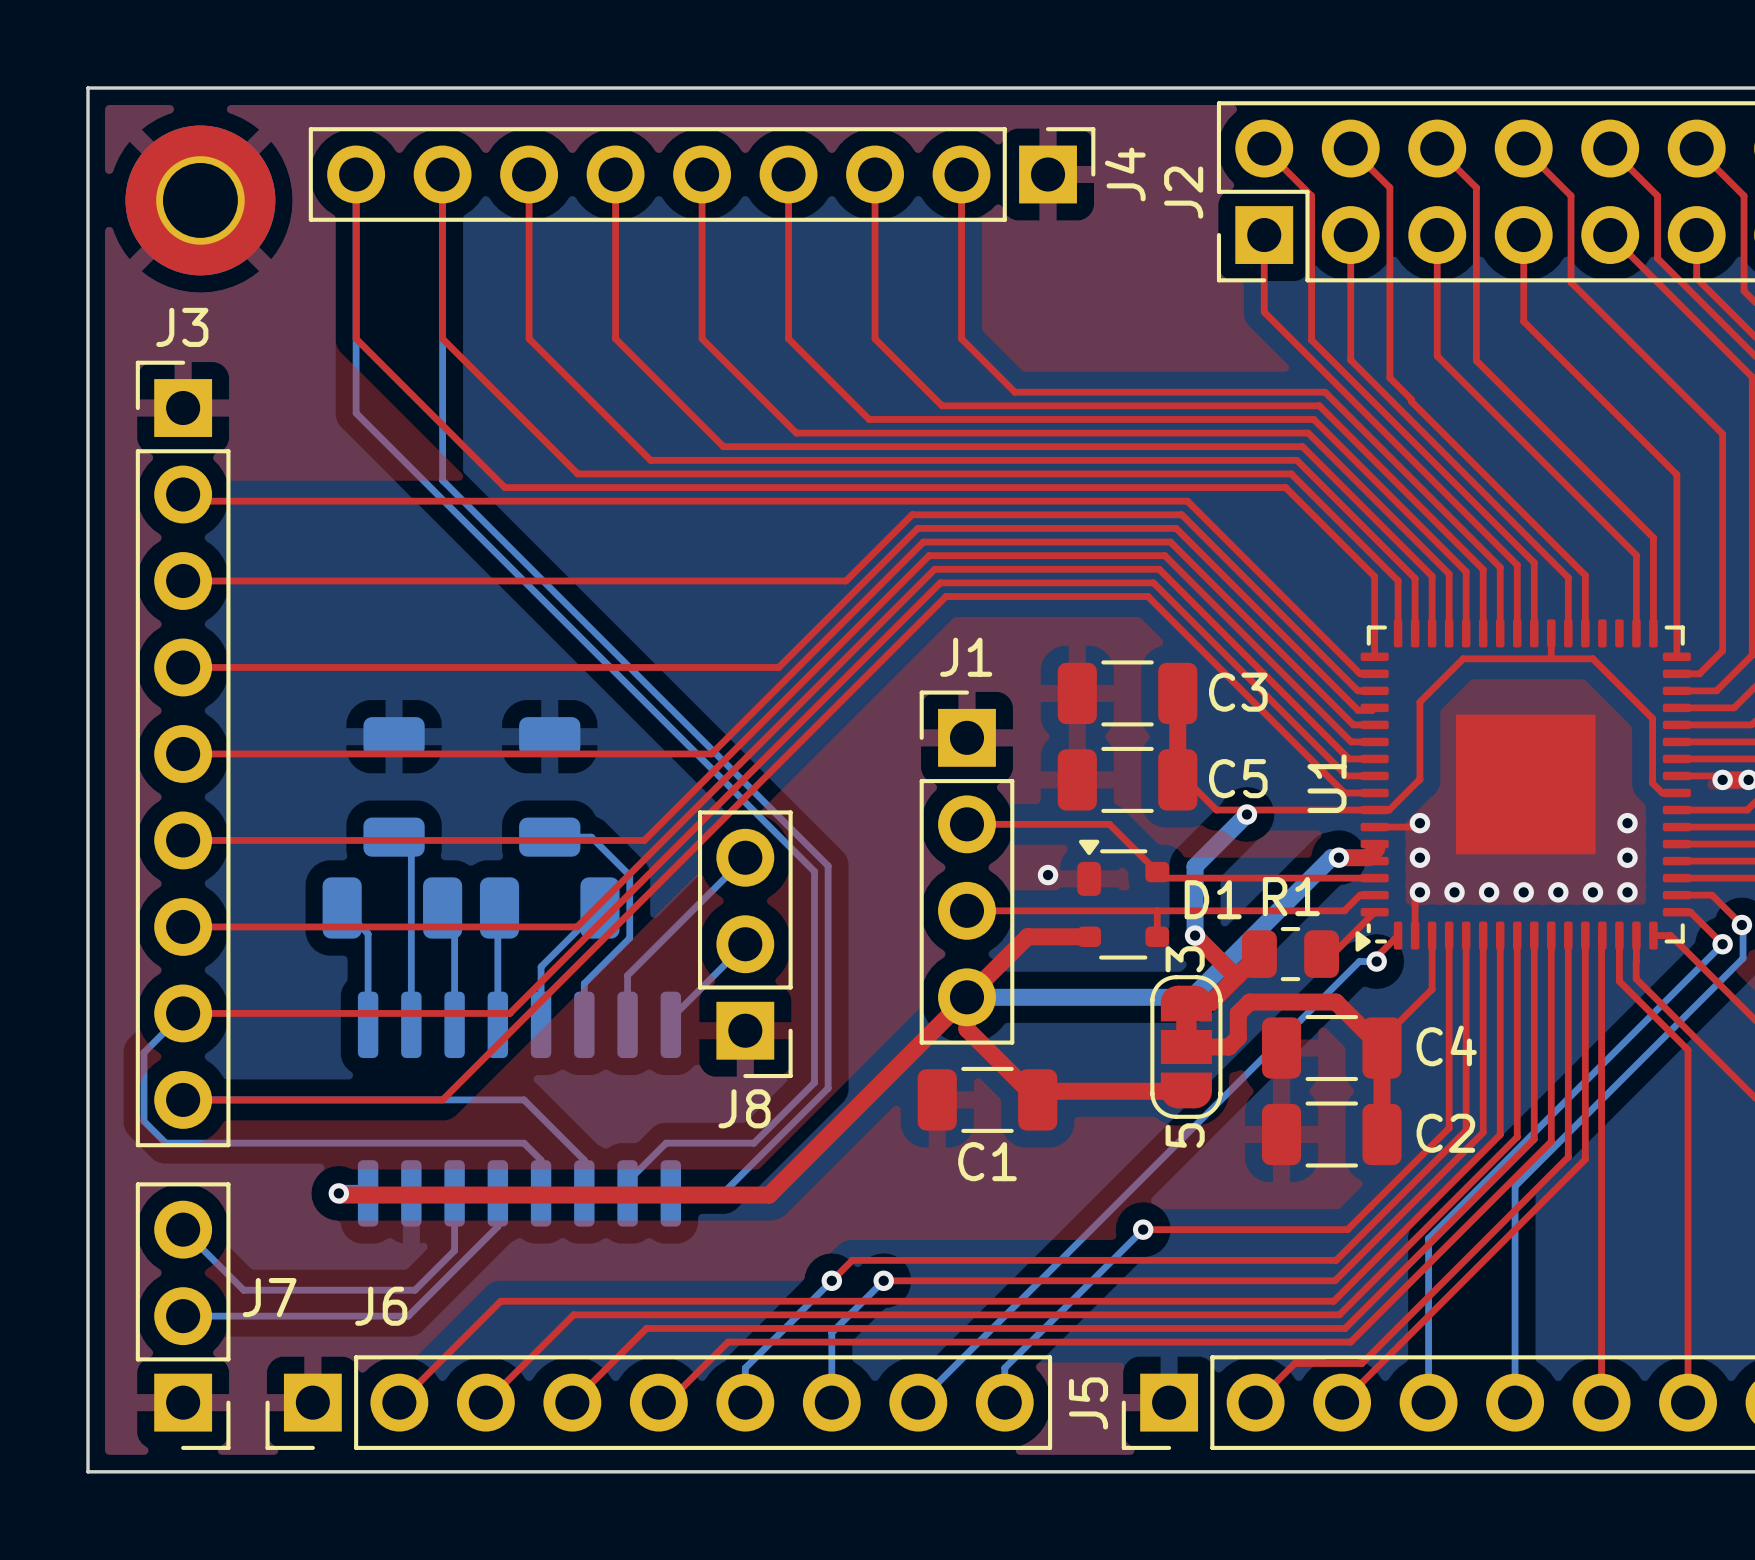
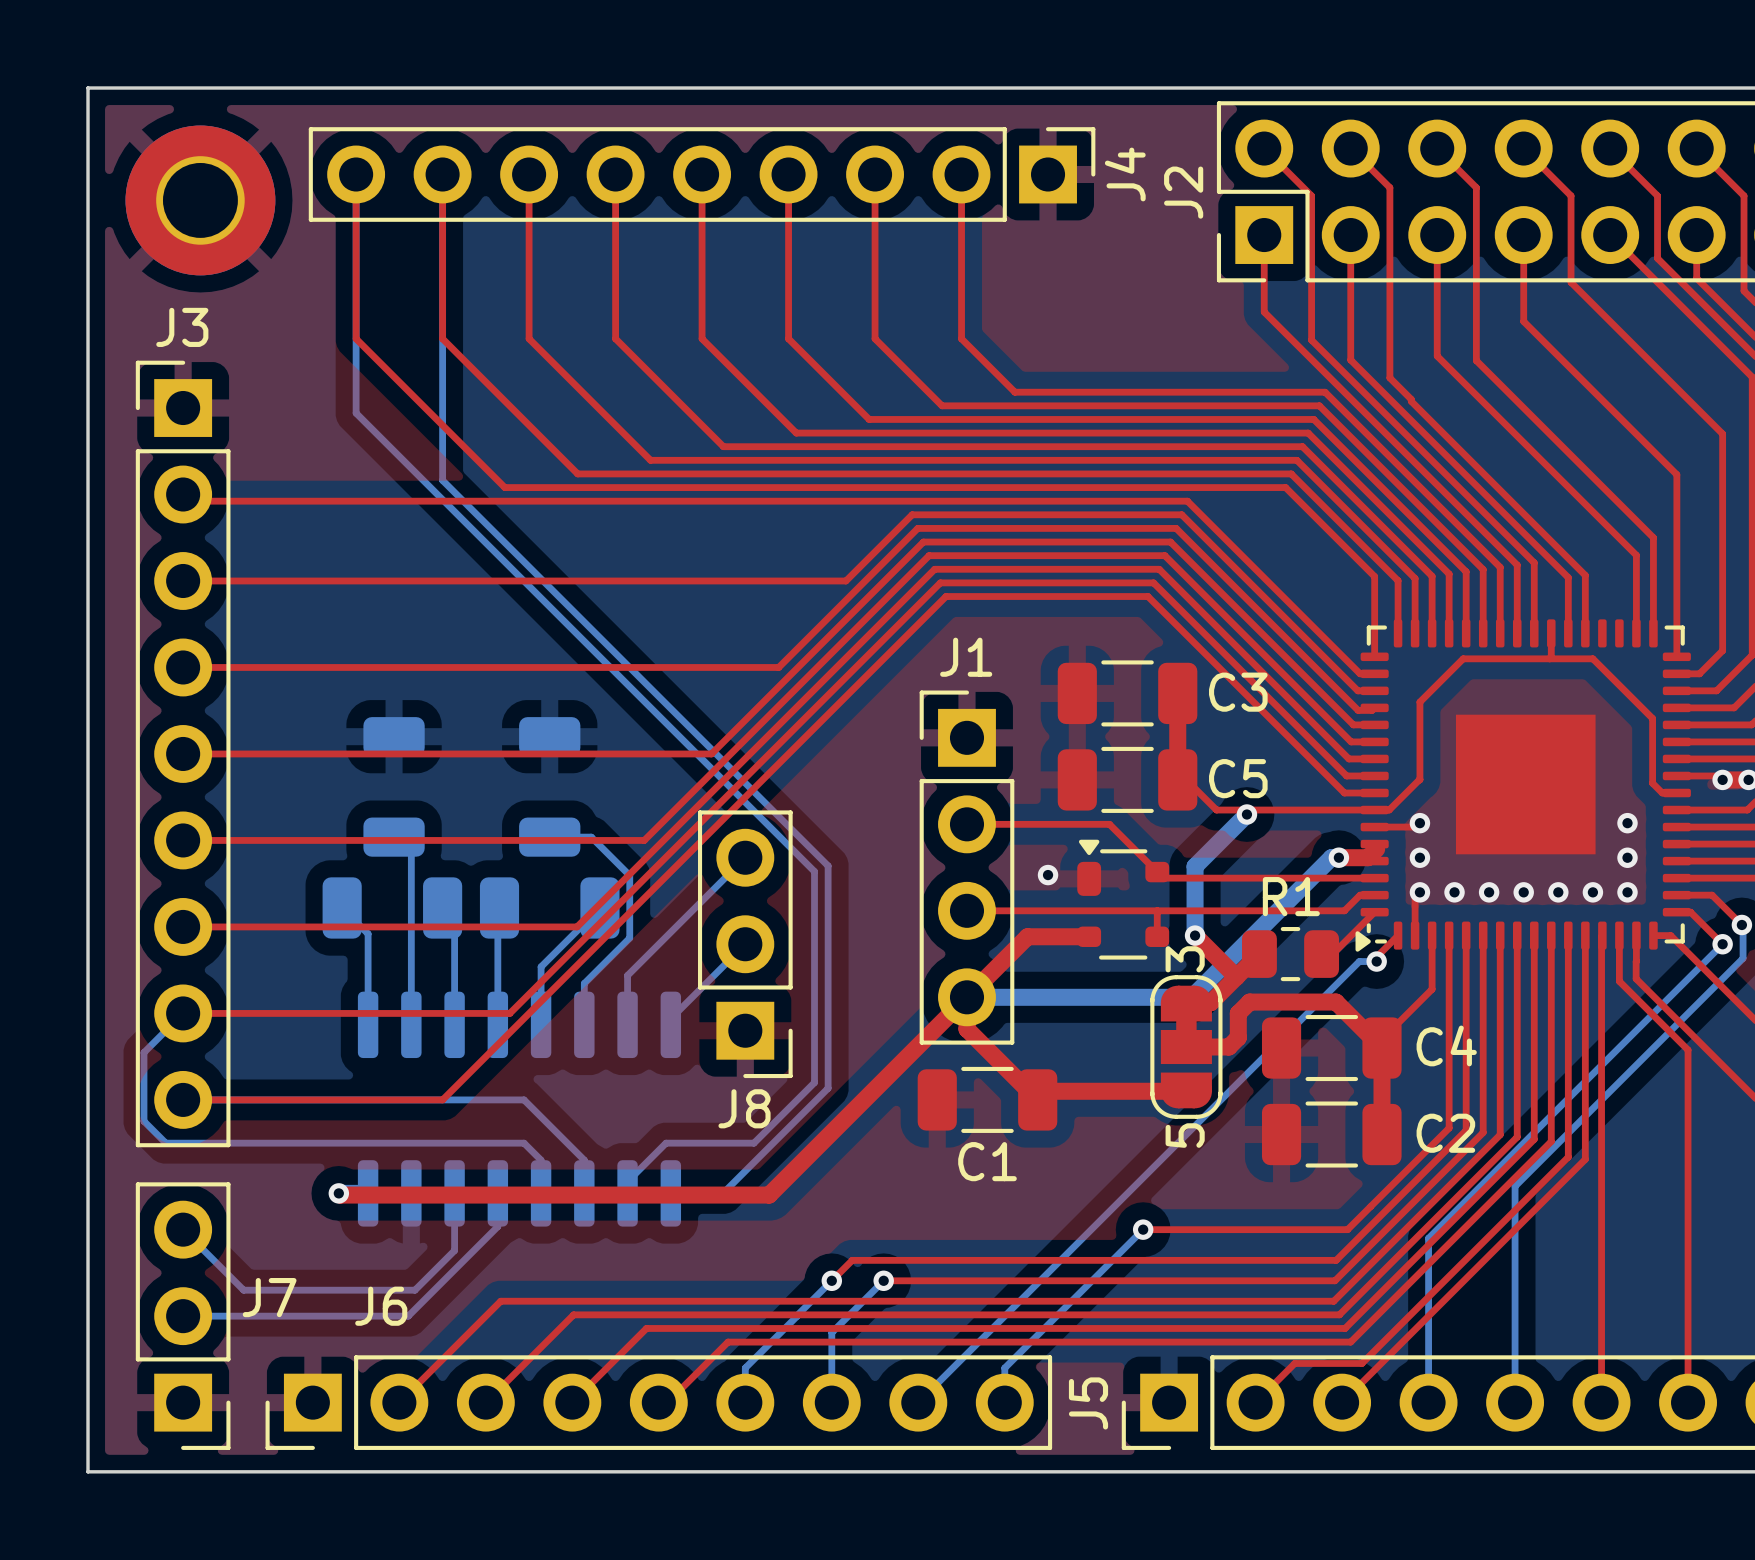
U1 name: U1 (1326, 783) -> none
D1 name: D1 (1213, 899) -> none

